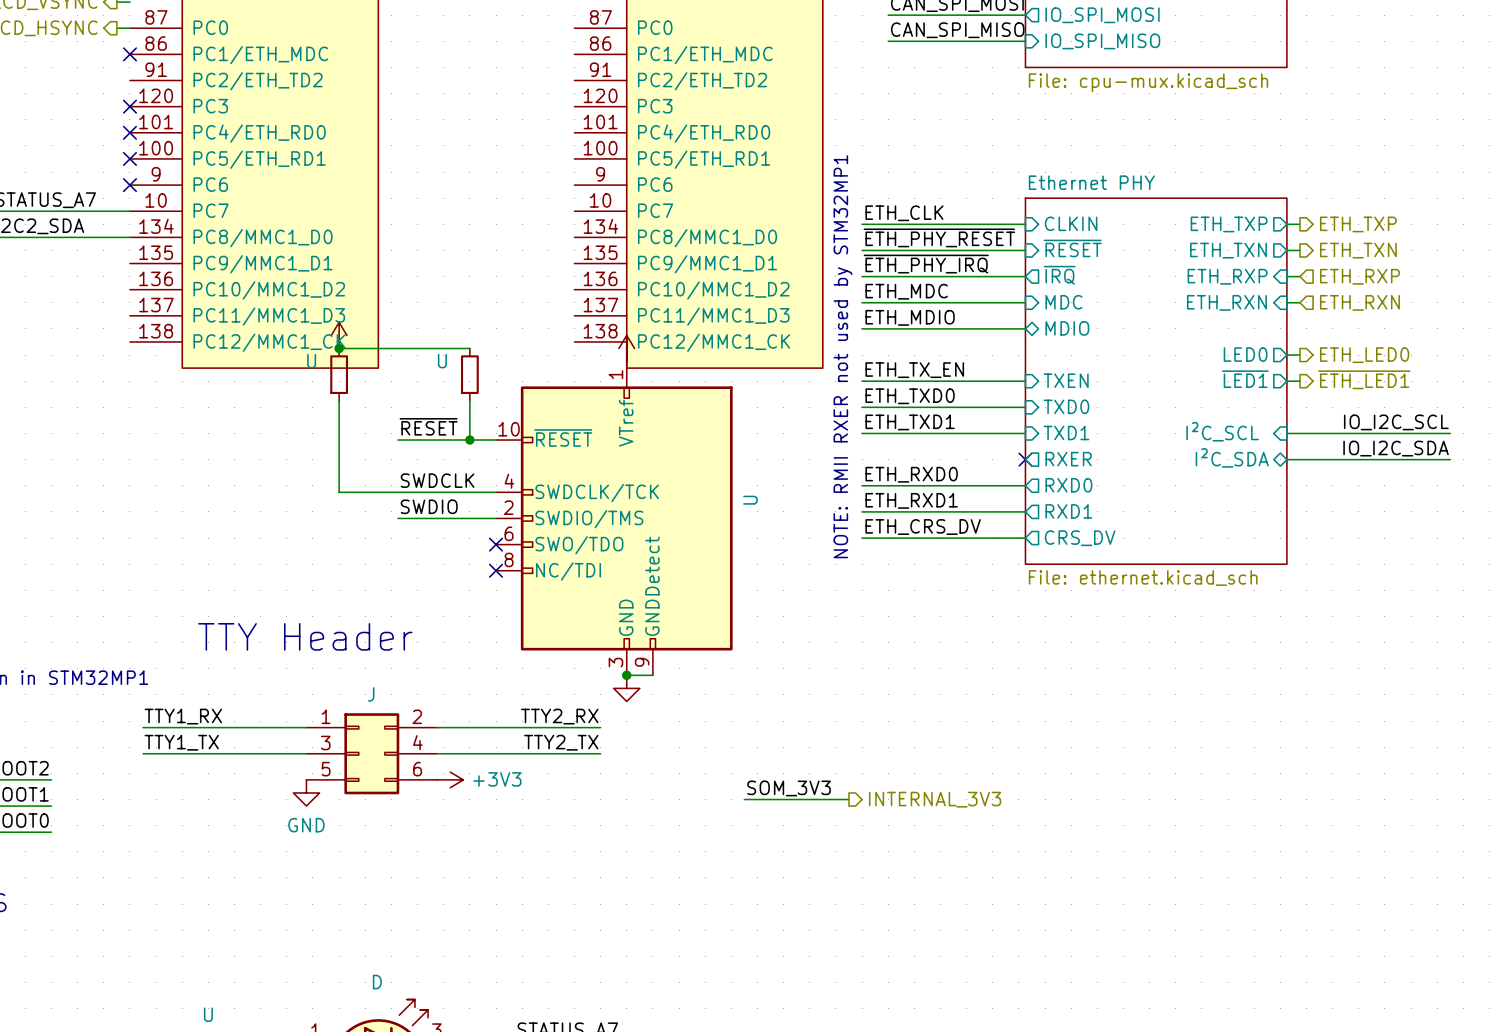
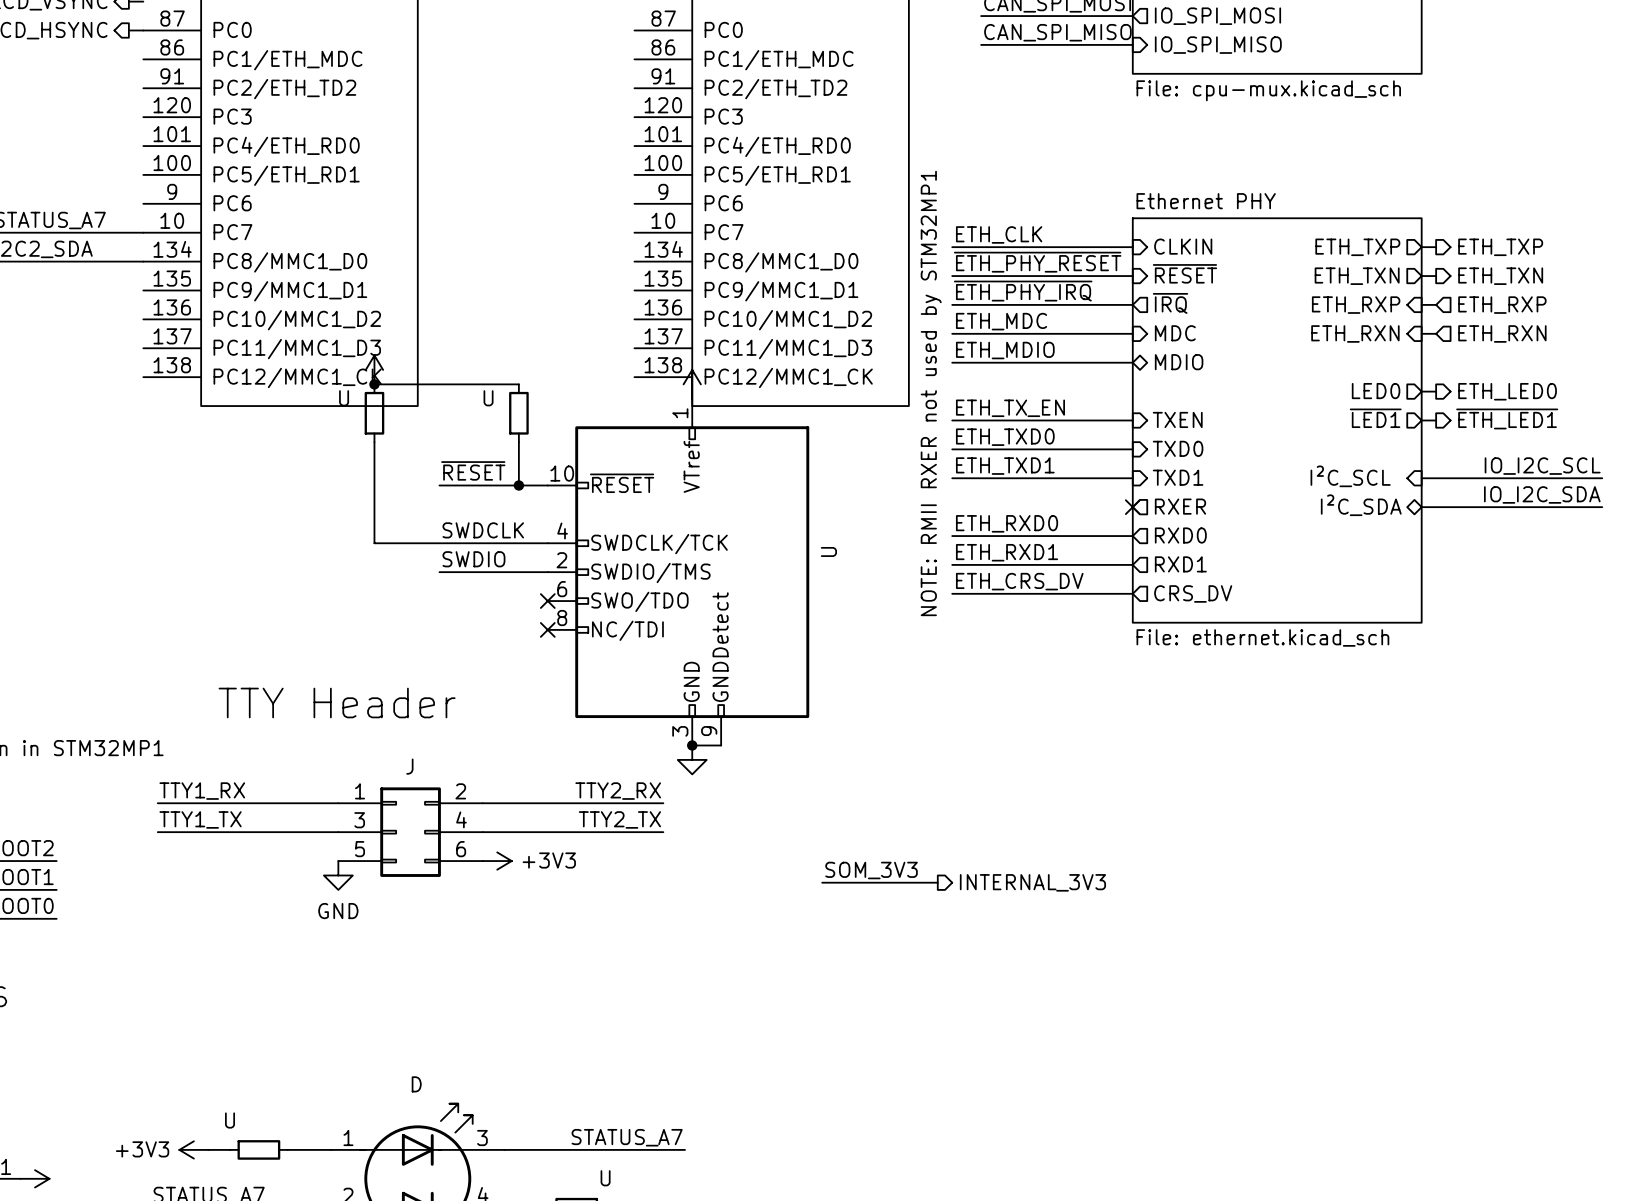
no-connect mark: (129, 54) -> none
no-connect mark: (129, 106) -> none
no-connect mark: (129, 132) -> none
no-connect mark: (129, 158) -> none
no-connect mark: (129, 185) -> none

